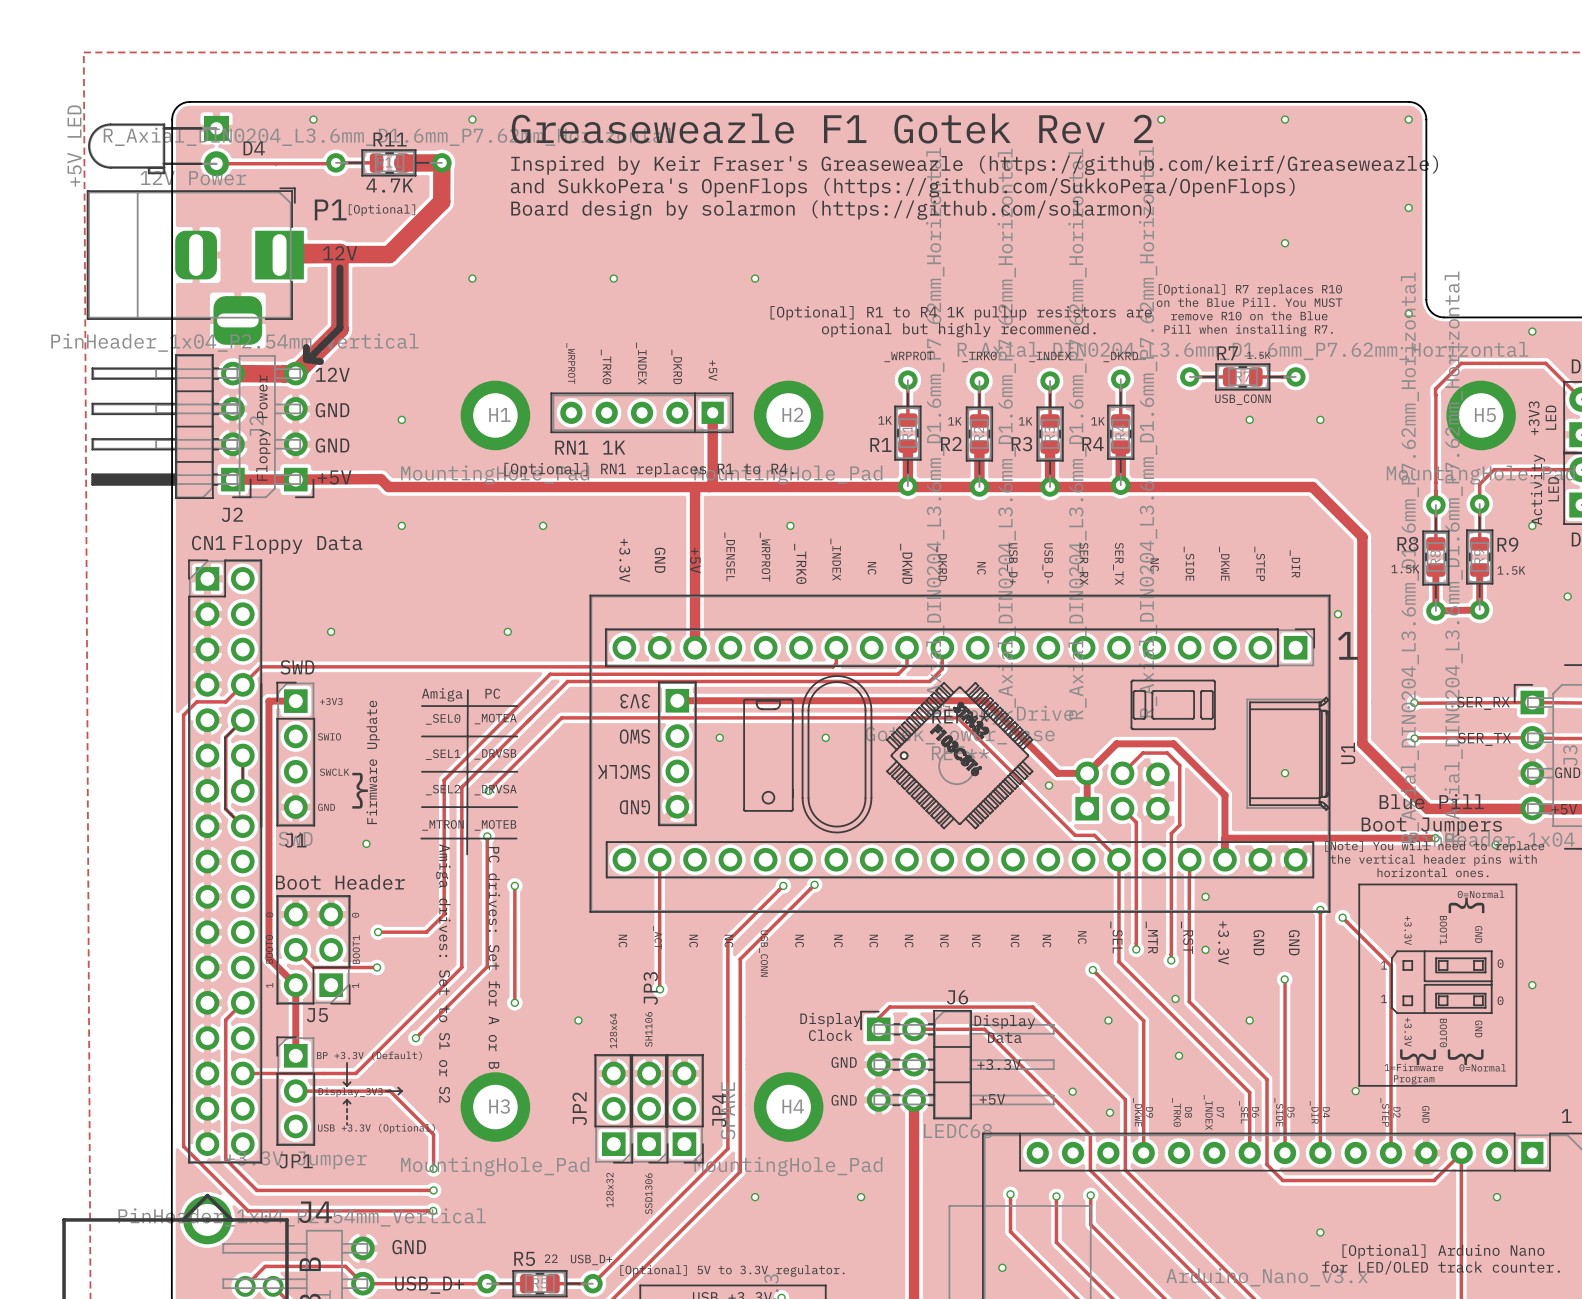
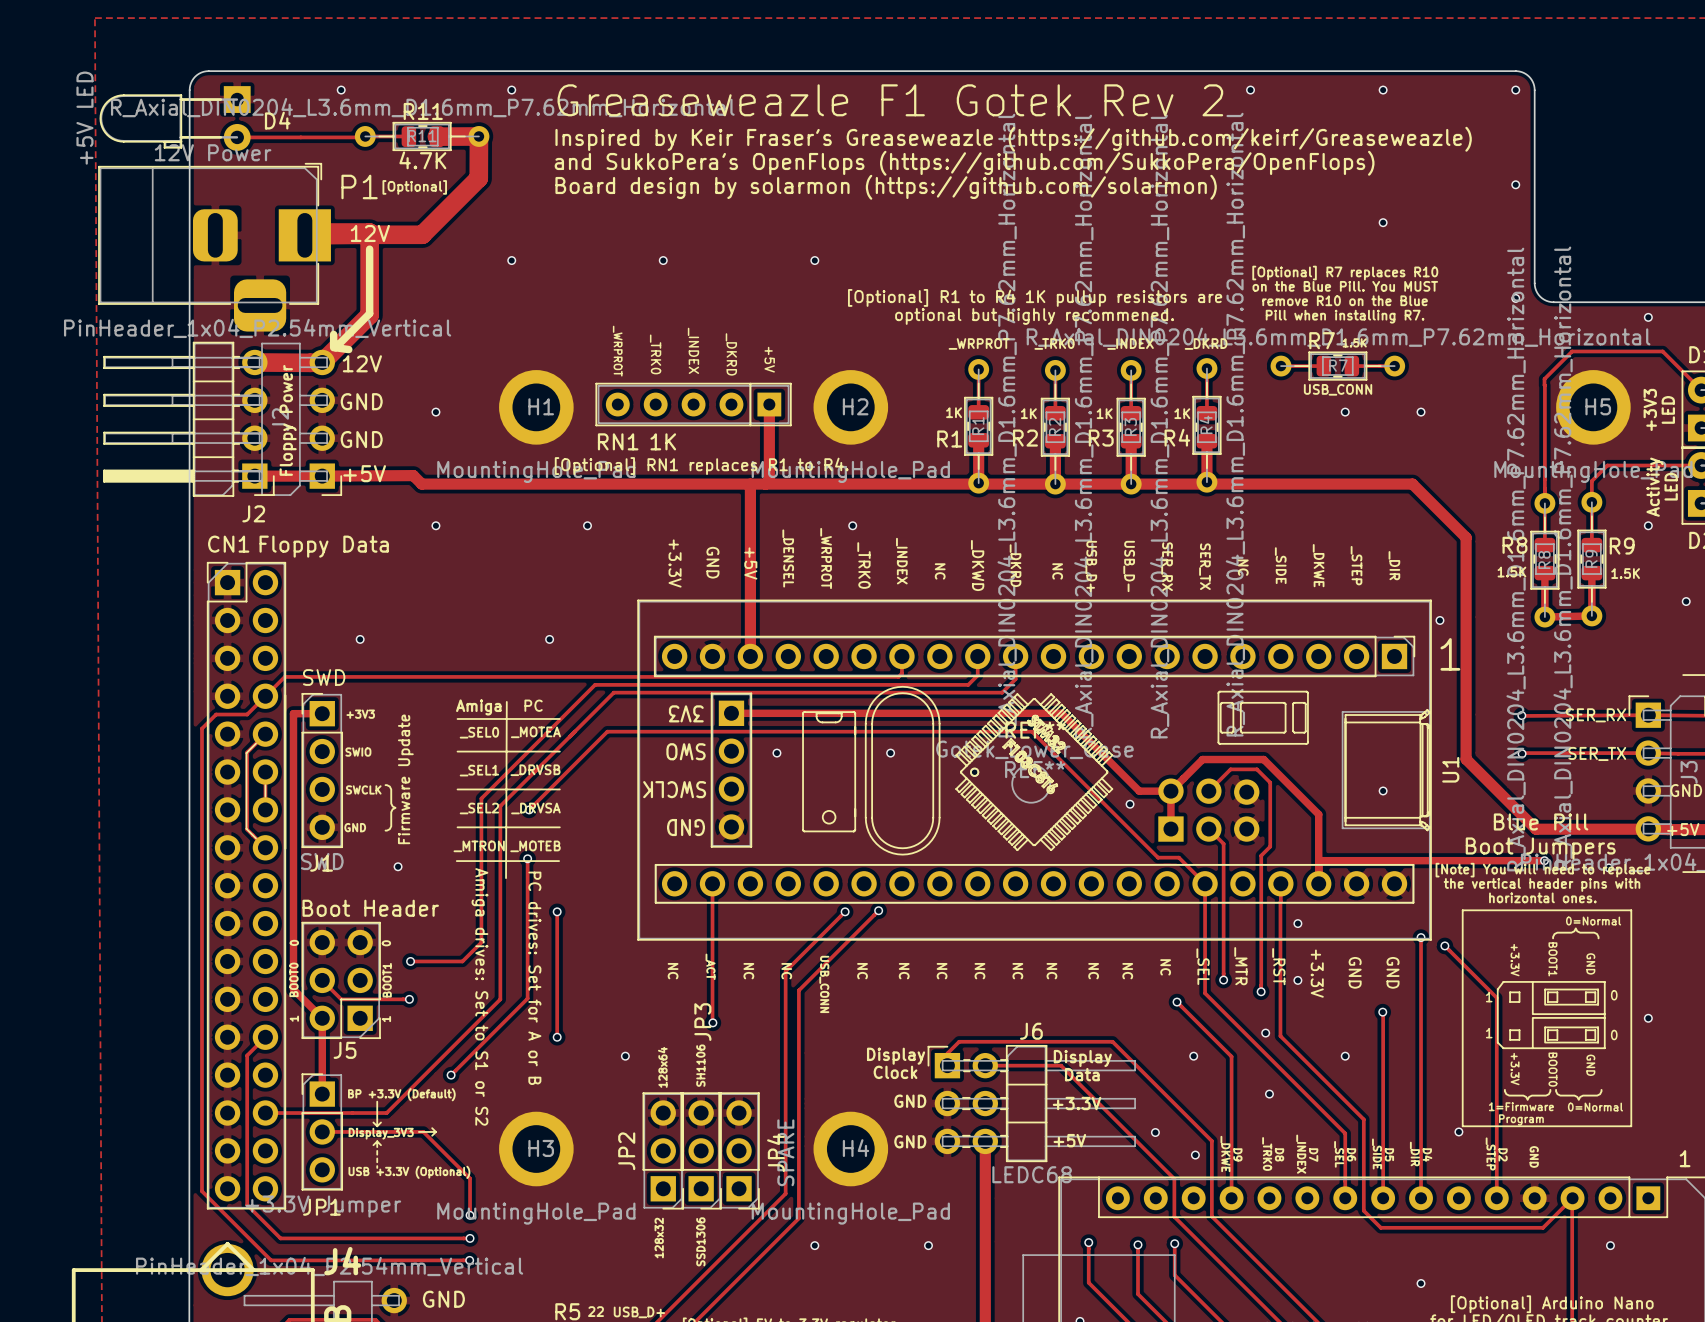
drawing: [933, 705, 1074, 725] -> none

